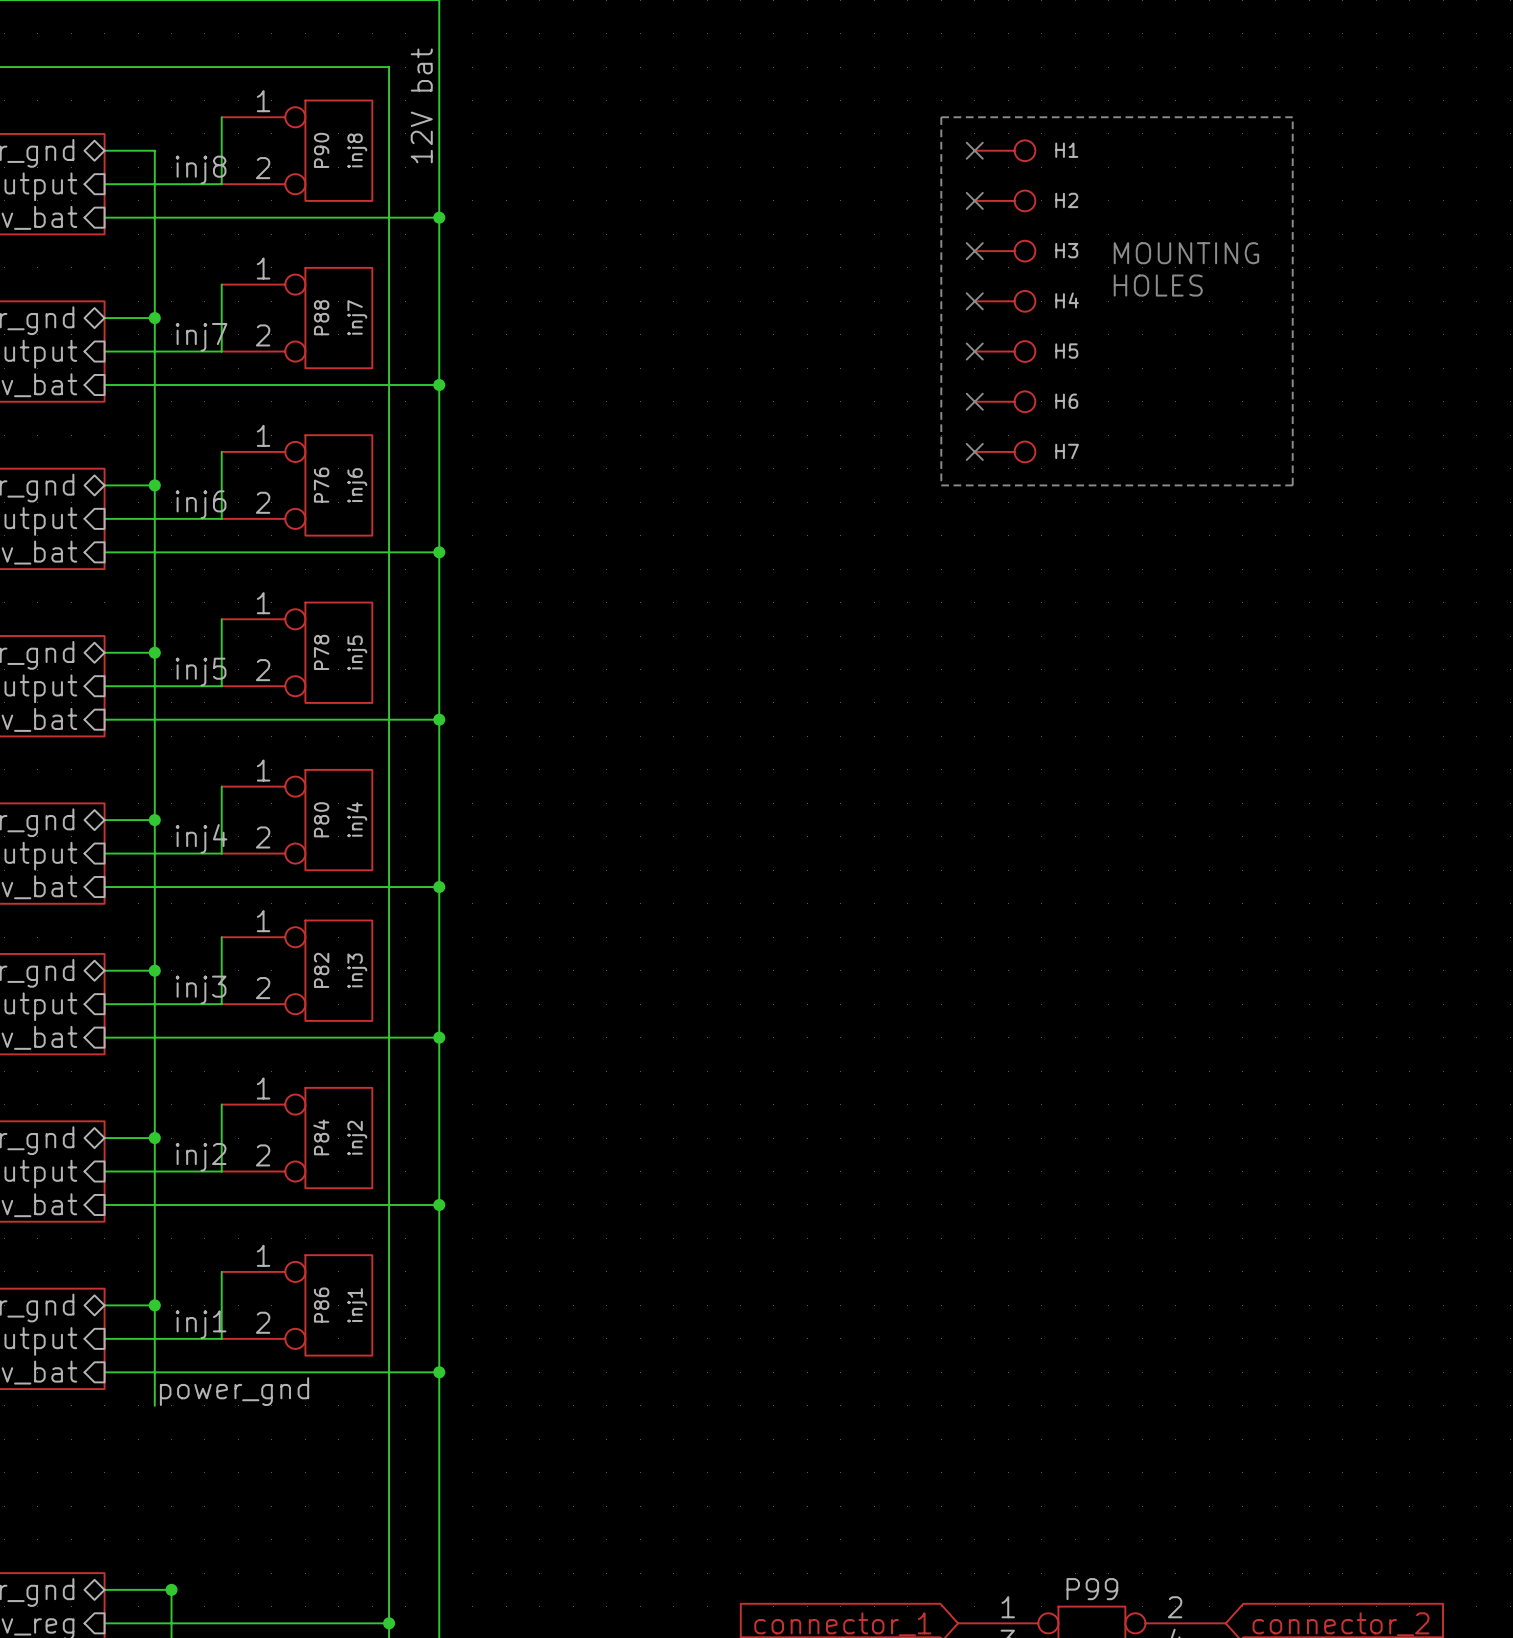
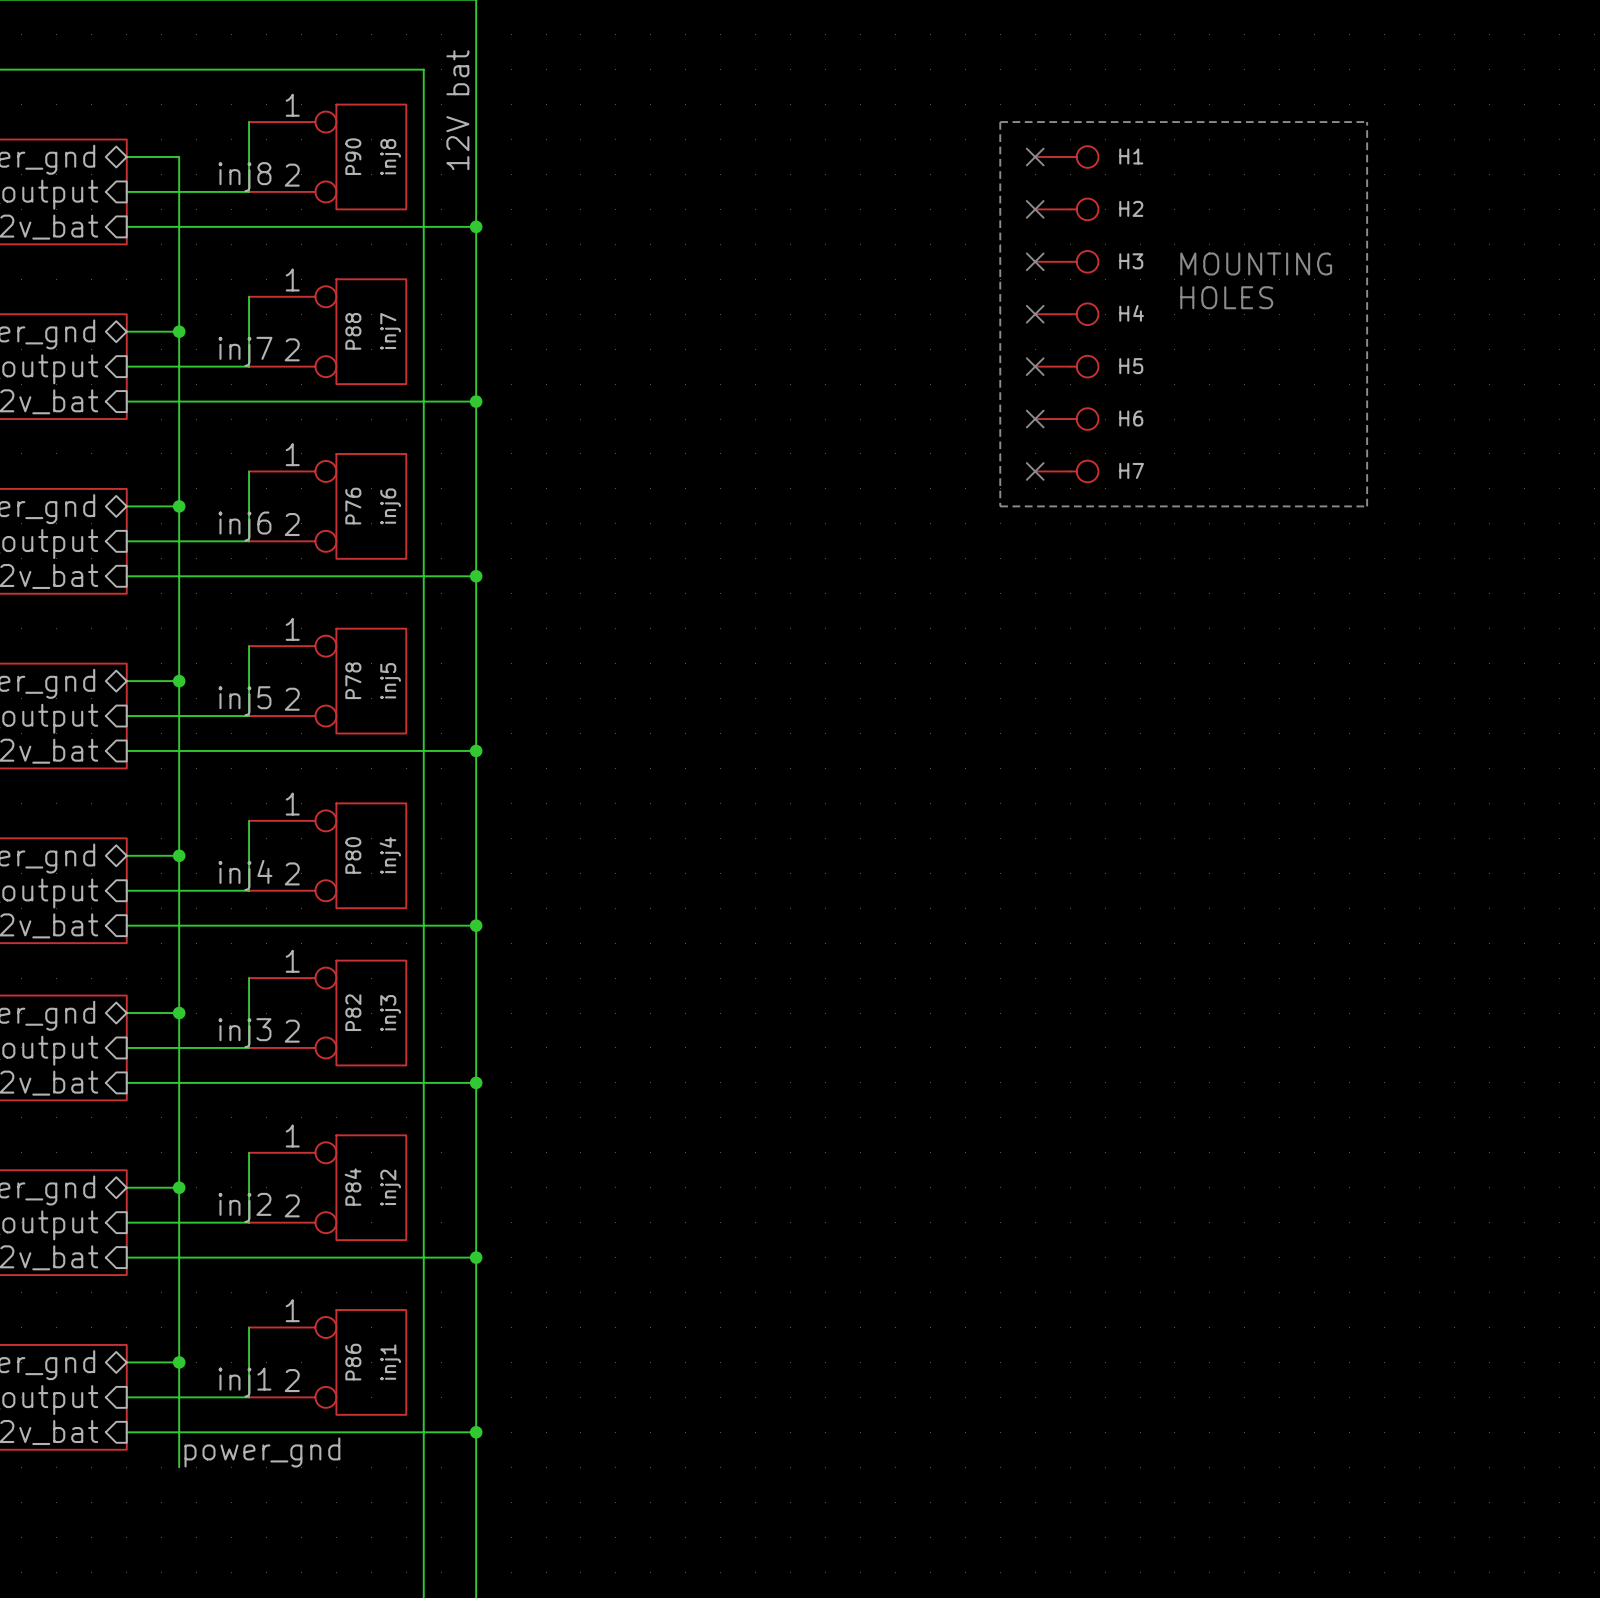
label position: inj8 (201, 170) -> inj8 (244, 177)
label position: inj7 (201, 337) -> inj7 (245, 351)
label position: inj6 (201, 504) -> inj6 (244, 526)
label position: inj5 (201, 672) -> inj5 (244, 701)
label position: inj4 (201, 838) -> inj4 (245, 875)
label position: inj3 (201, 990) -> inj3 (244, 1033)
label position: inj2 (201, 1157) -> inj2 (244, 1207)
label position: inj1 (201, 1324) -> inj1 (244, 1382)

